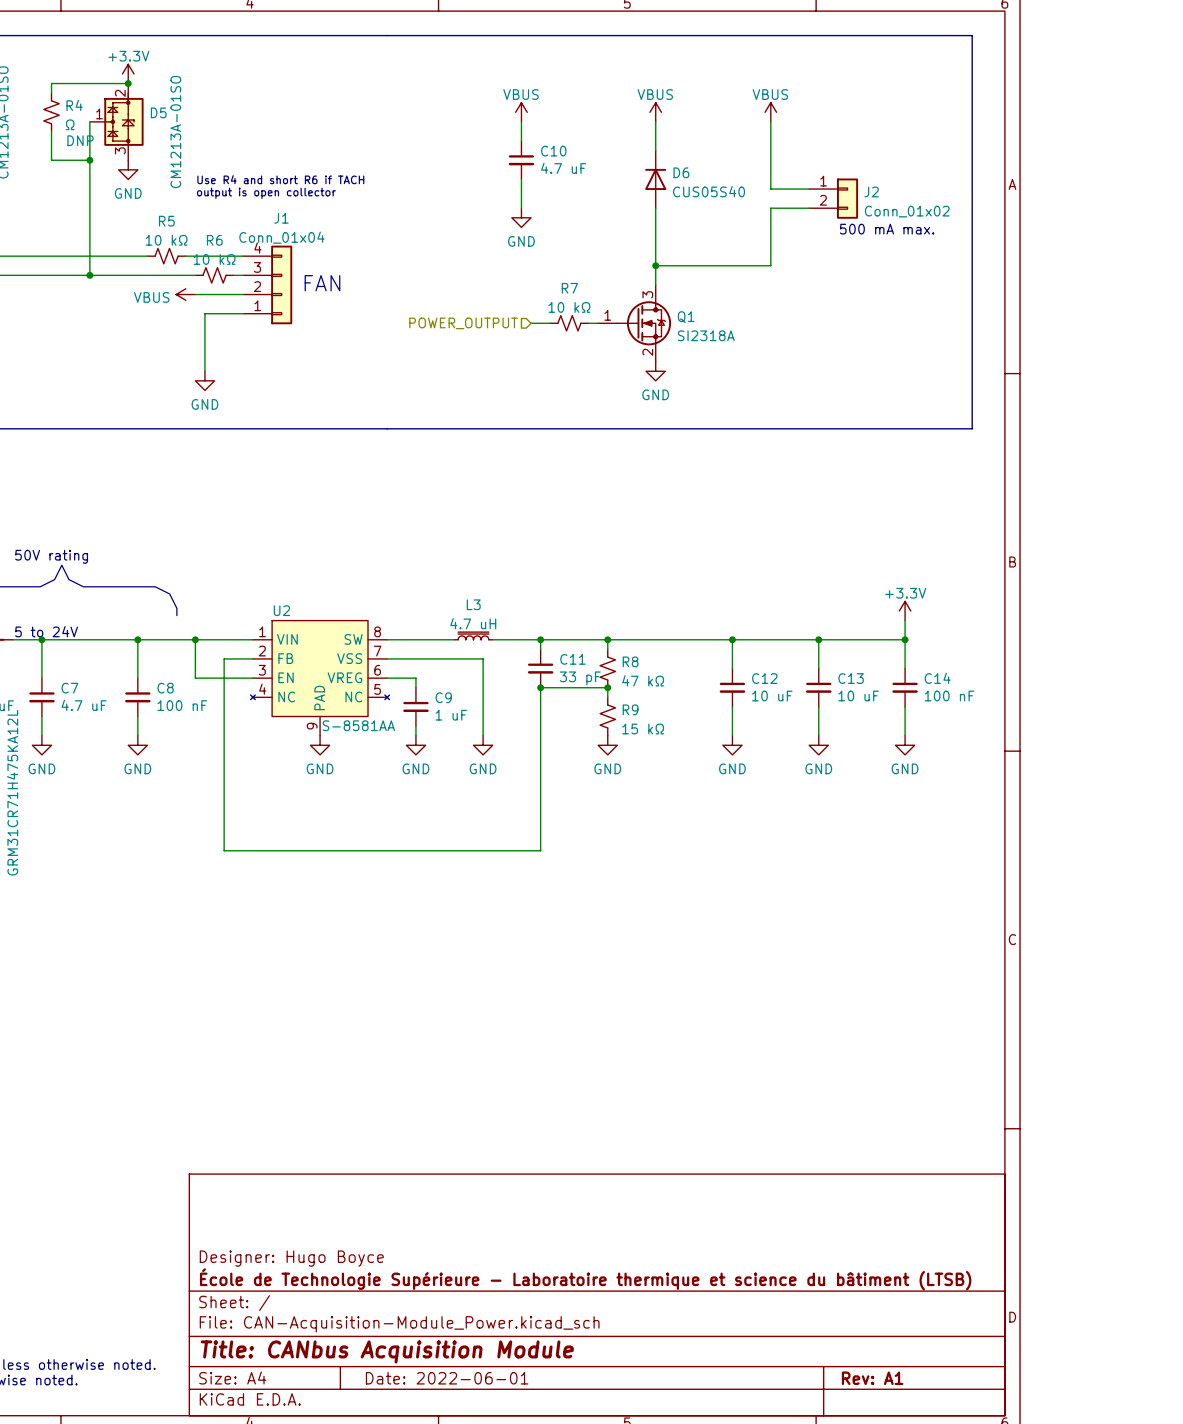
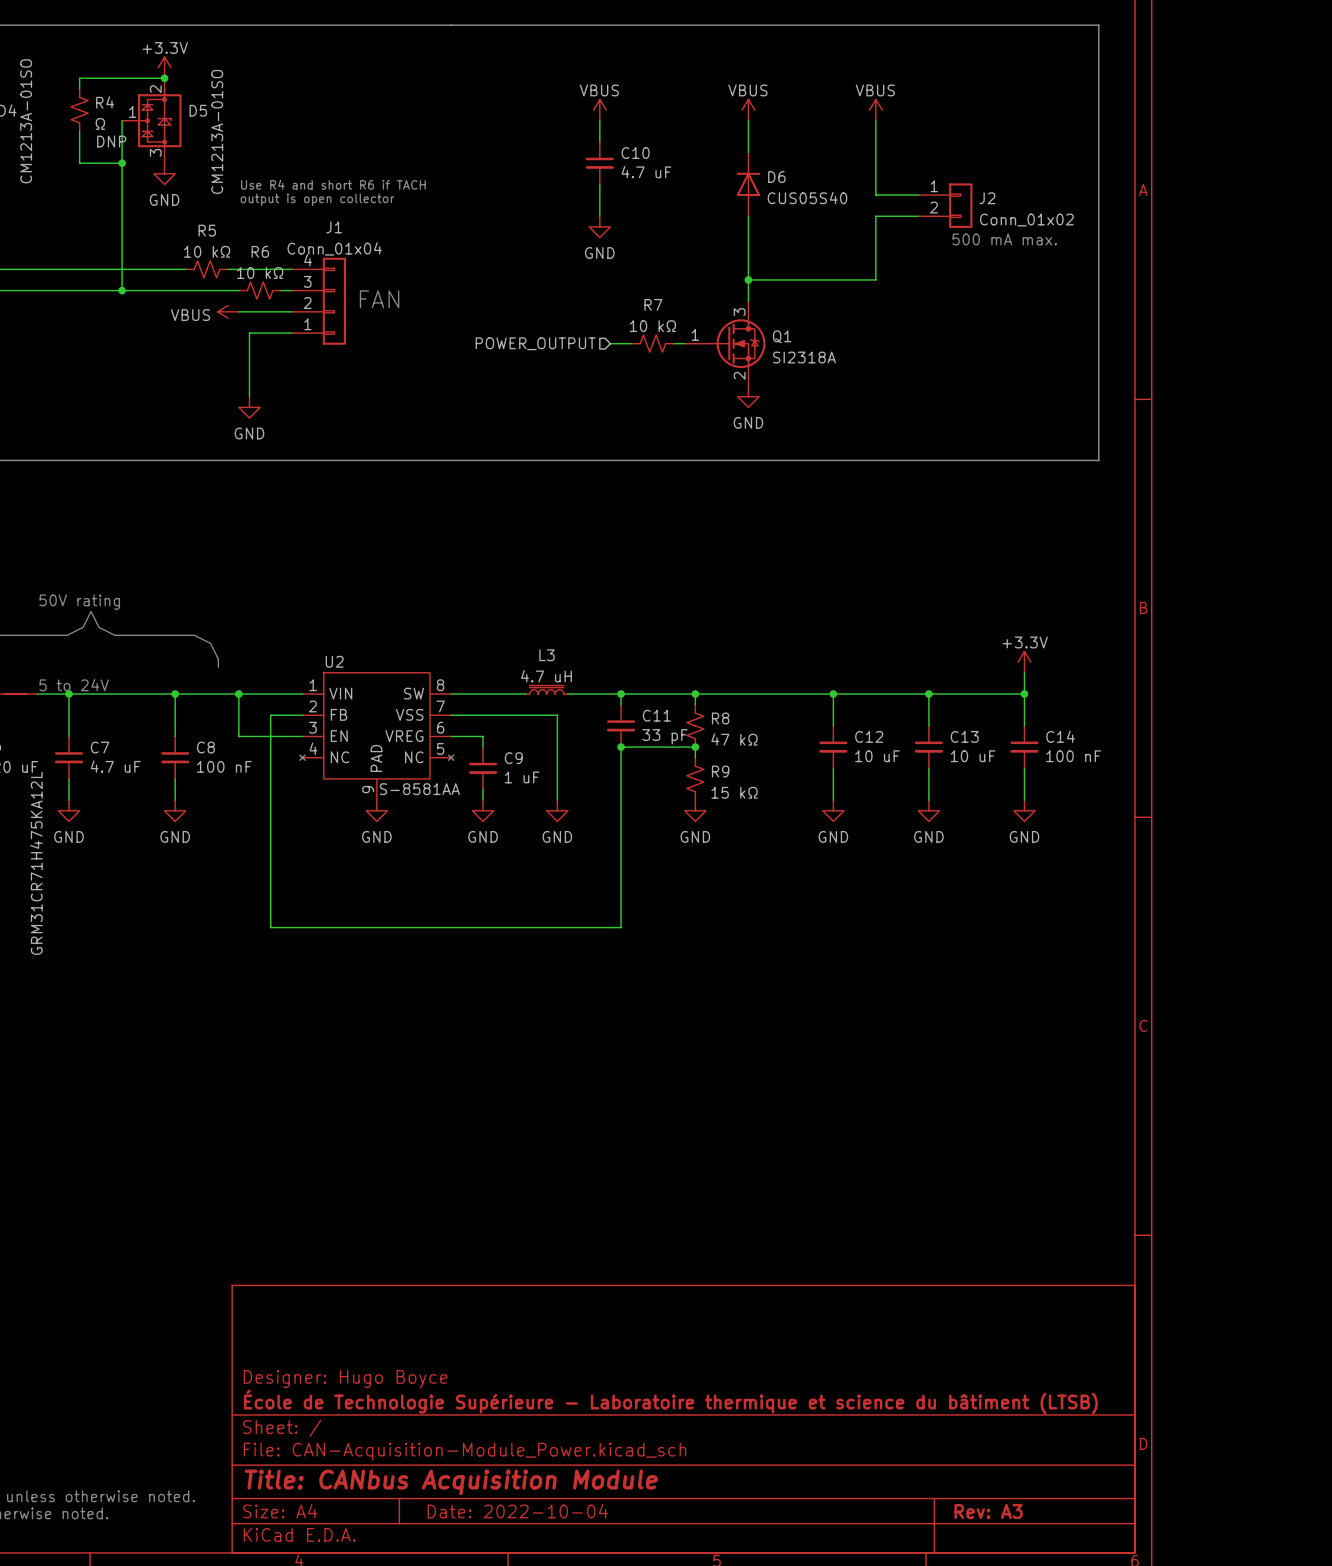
title block: Date: 2022-06-01 (447, 1378) -> Date: 2022-10-04 (517, 1511)
title block: Rev: A1 (872, 1378) -> Rev: A3 (988, 1511)

